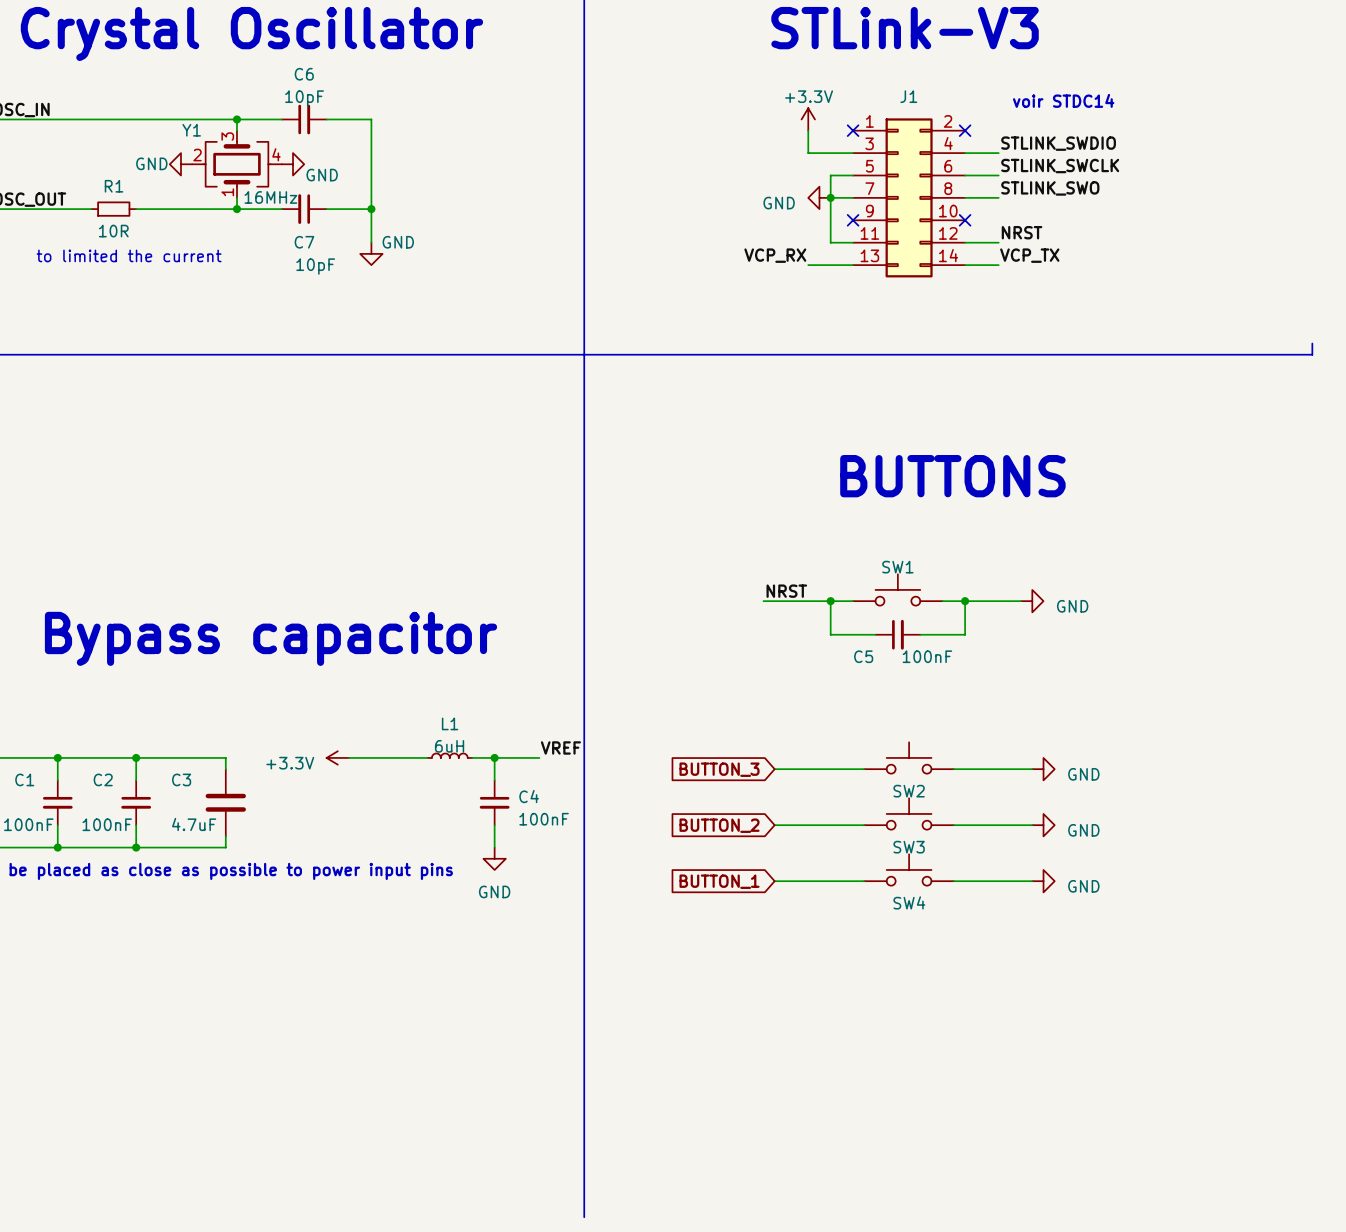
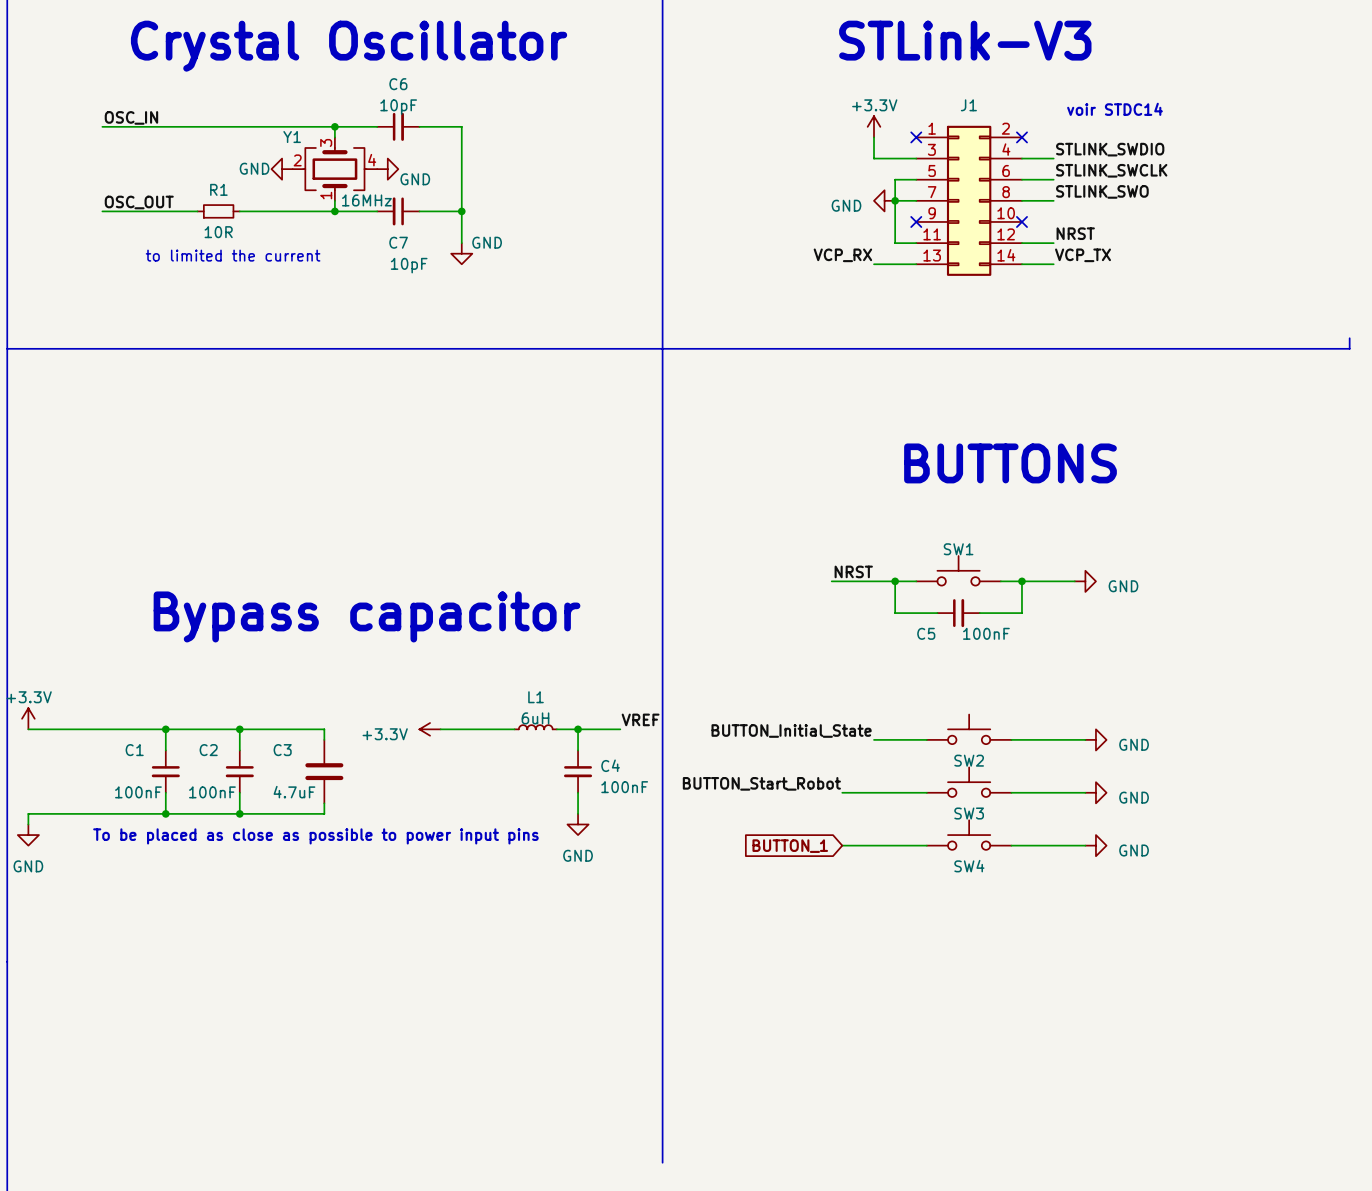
label: none -> BUTTON_Initial_State (791, 730)
global label: BUTTON_3 (719, 769) -> none
wire: (774, 769) (808, 769) -> none
label: none -> BUTTON_Start_Robot (761, 783)
global label: BUTTON_2 (719, 825) -> none

